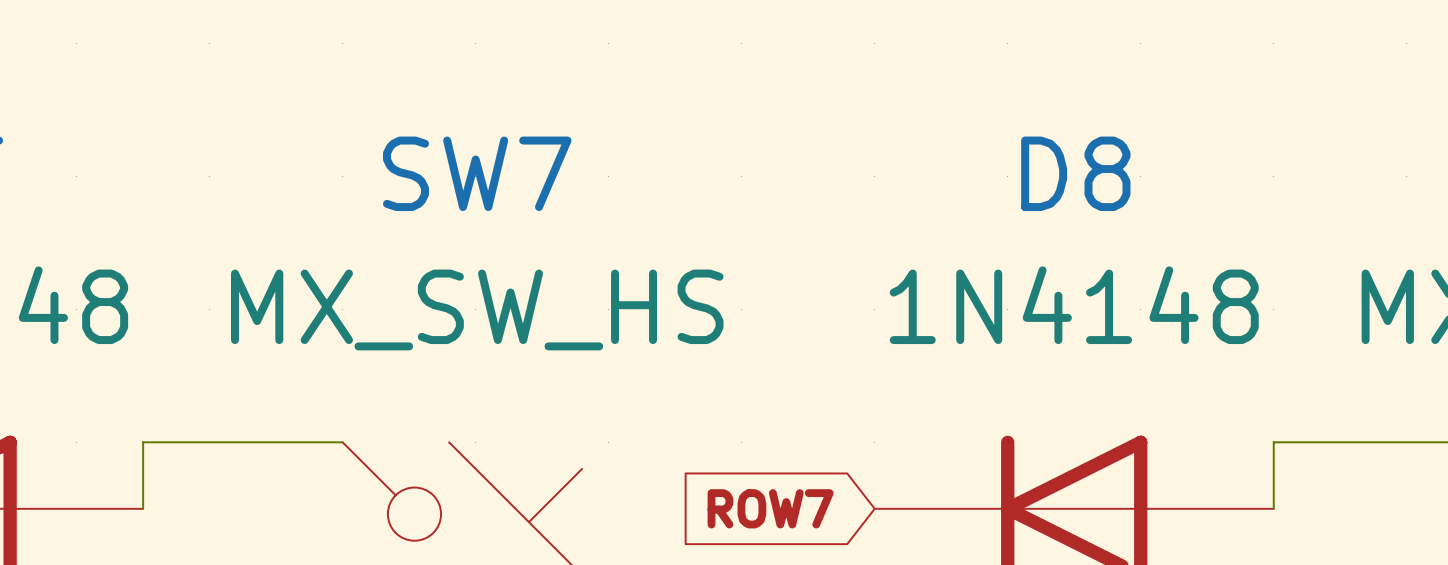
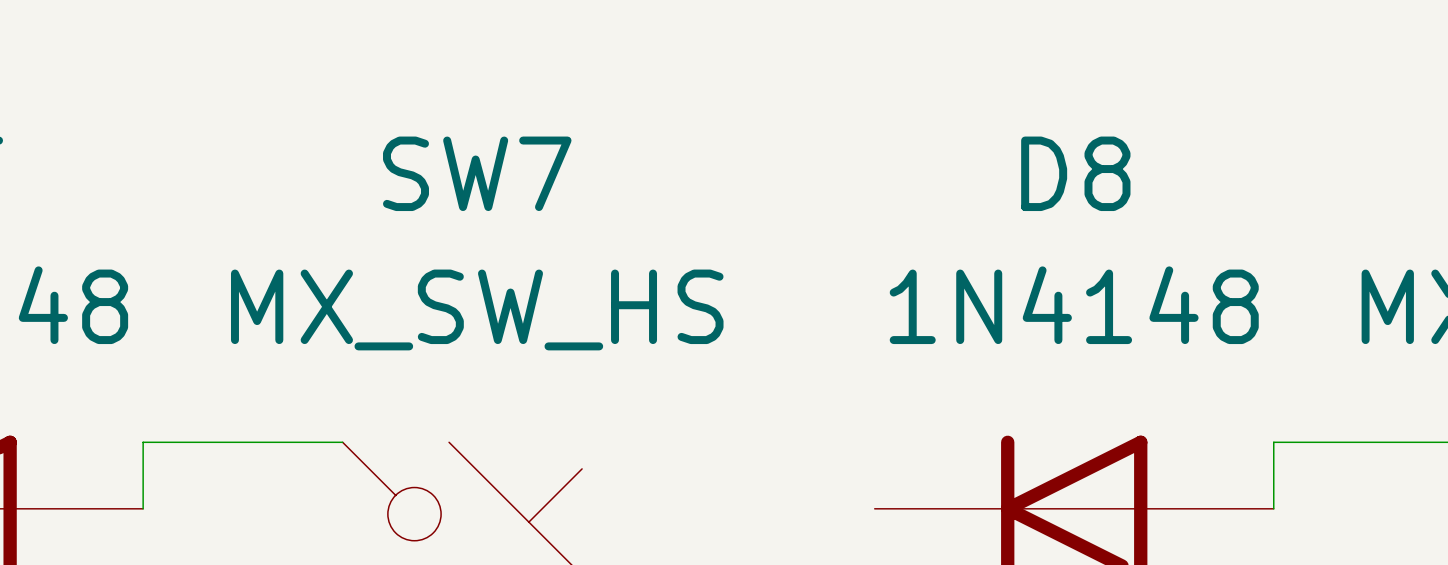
global label: ROW7 (770, 508) -> none

